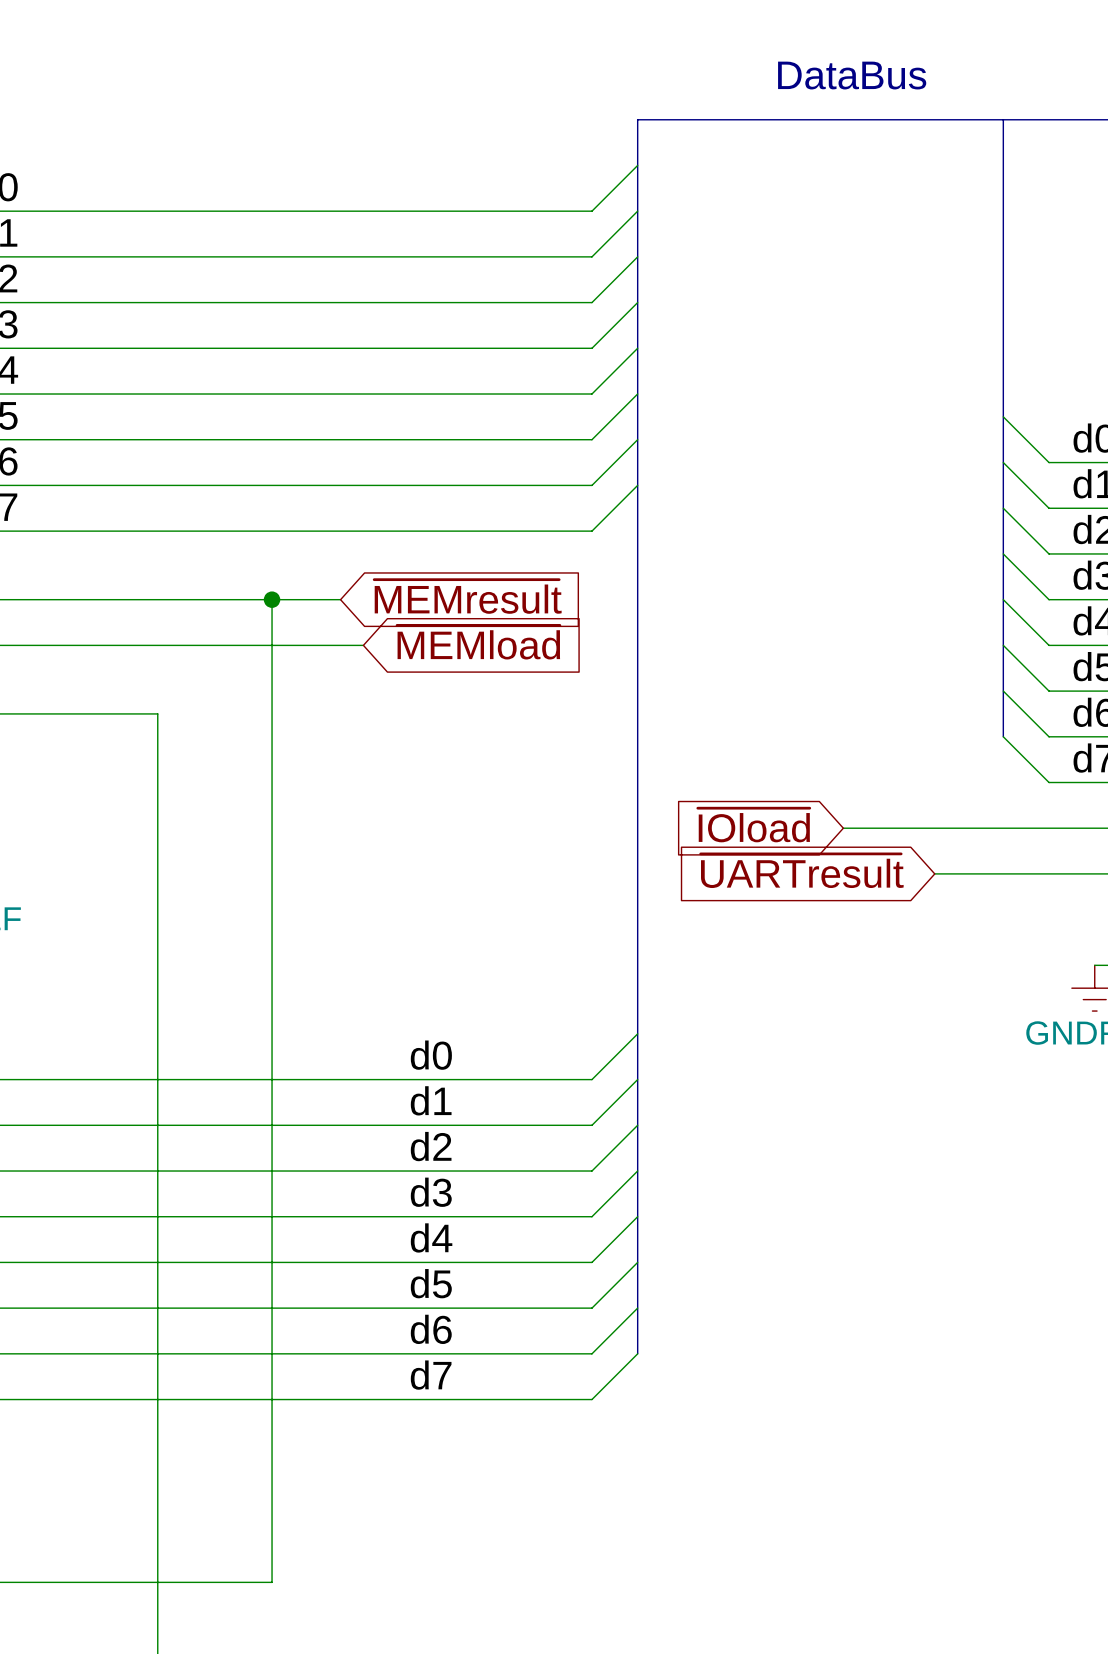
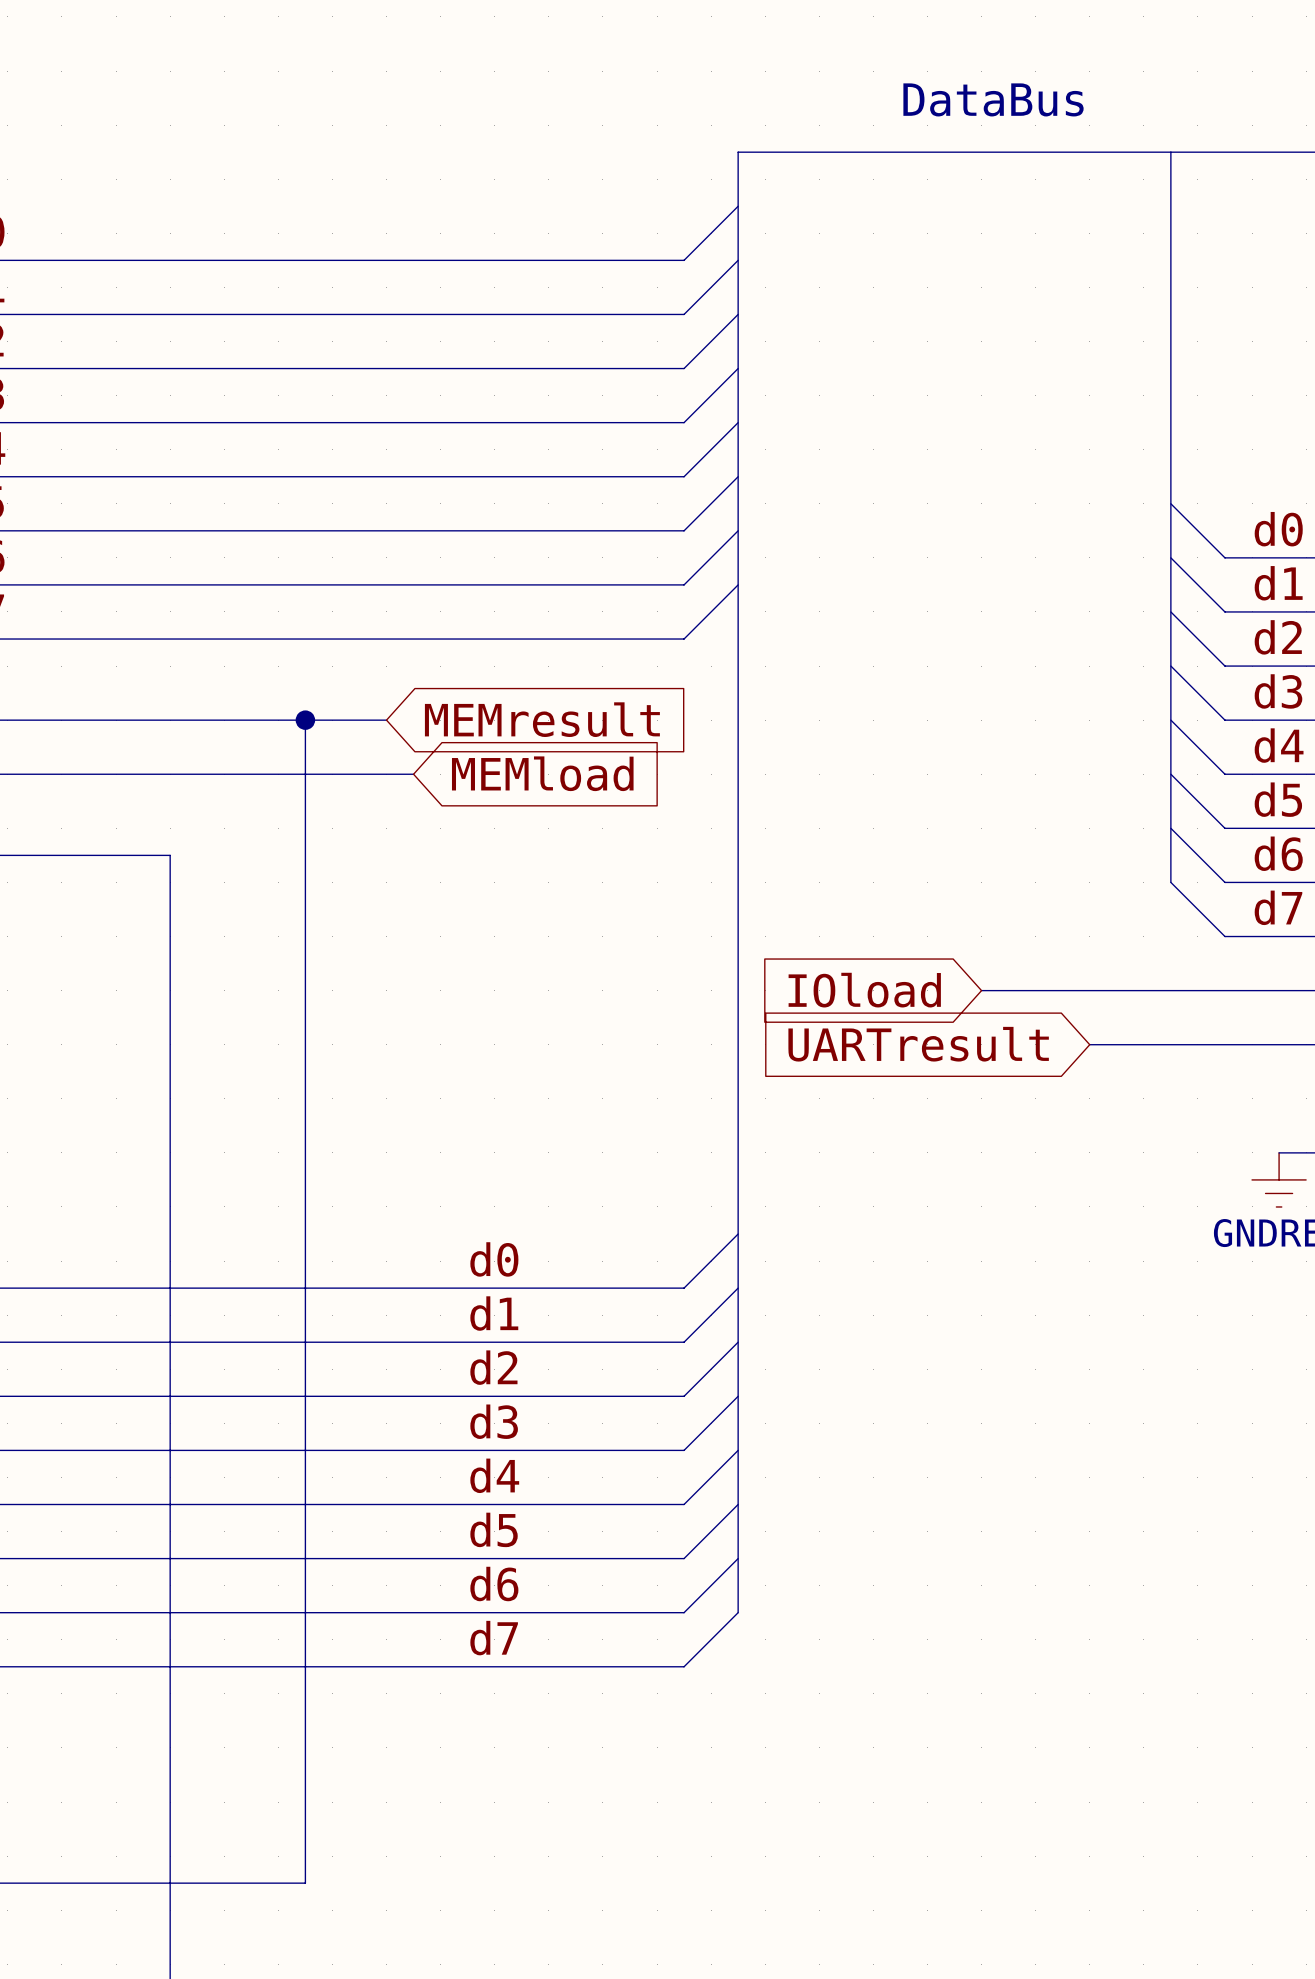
global label: ~{MEMresult} (467, 596) -> MEMresult (542, 719)
global label: ~{MEMload} (478, 642) -> MEMload (542, 773)
global label: ~{IOload} (753, 825) -> IOload (864, 990)
global label: ~{UARTresult} (802, 870) -> UARTresult (918, 1044)

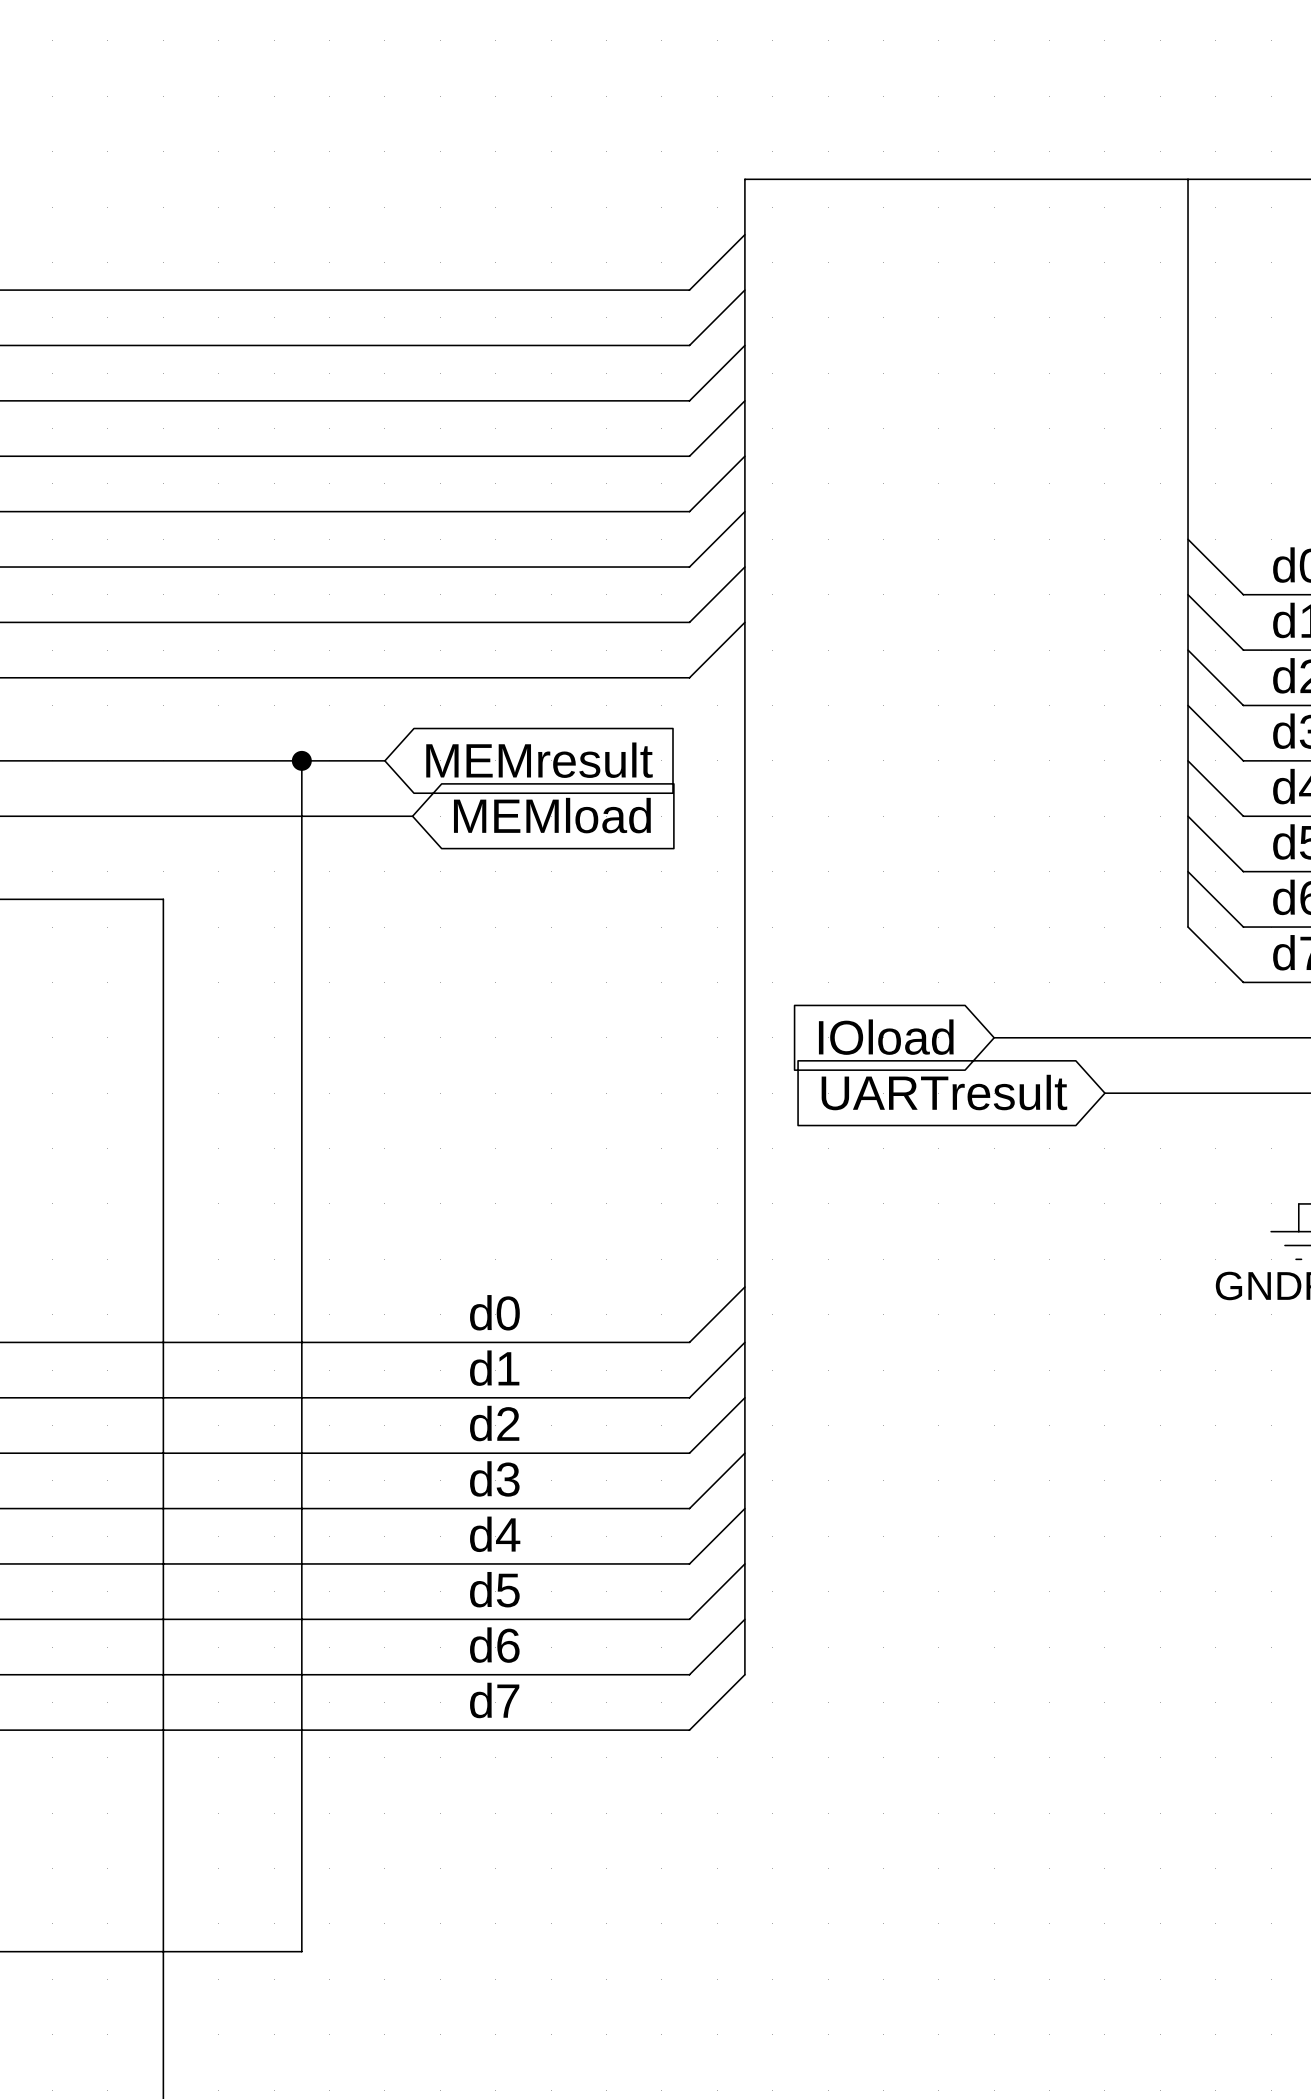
text: DataBus (993, 99) -> none

